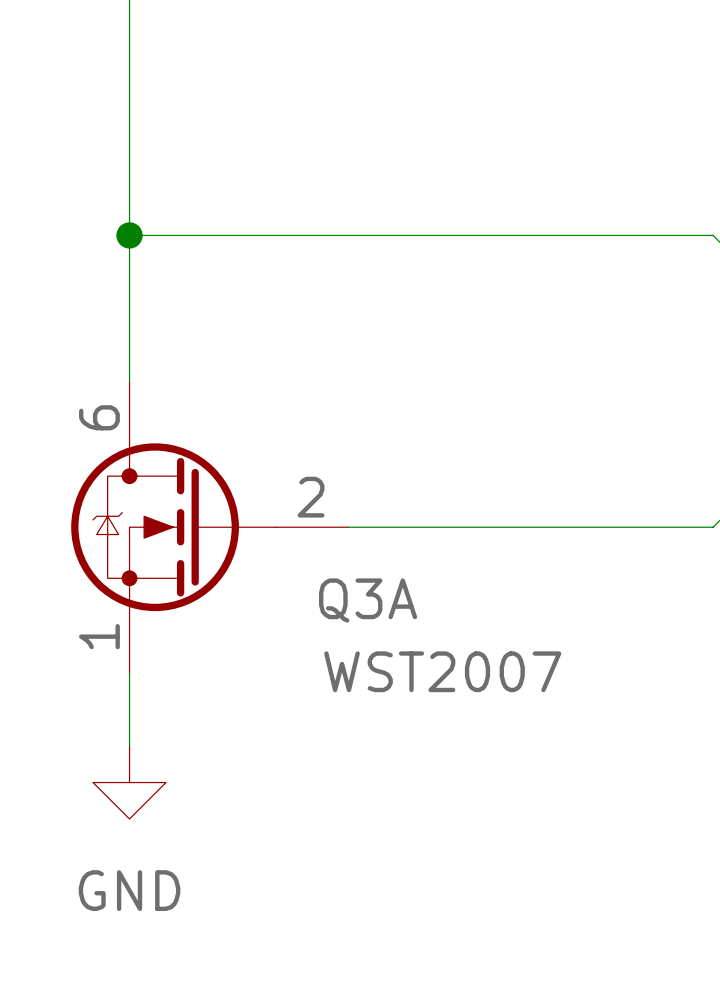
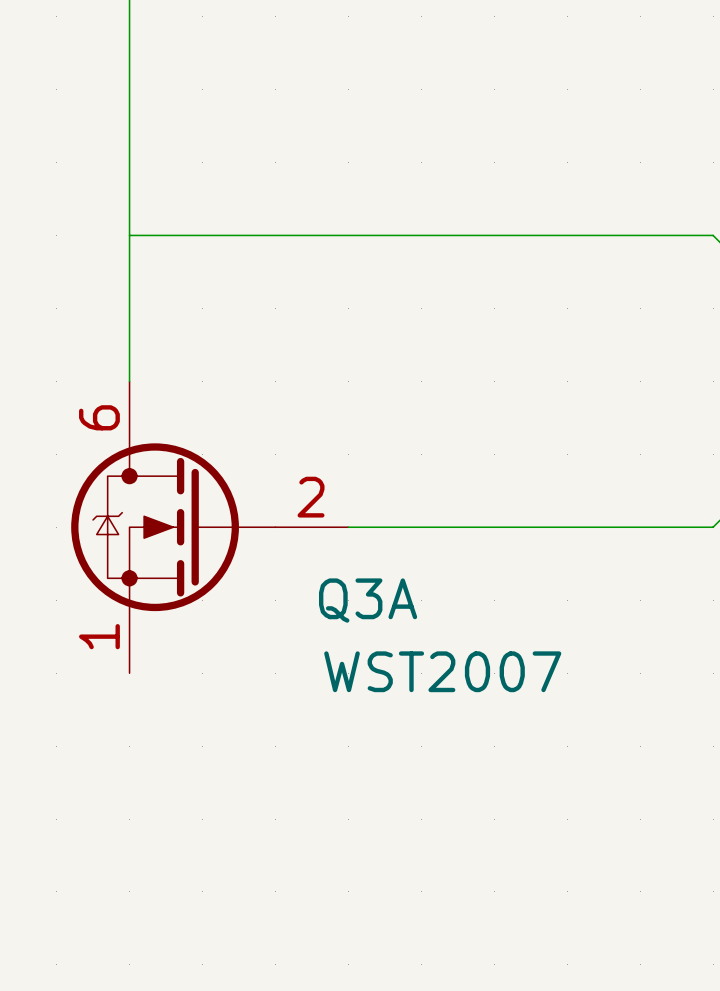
junction: (129, 235) -> none
wire: (129, 673) (129, 746) -> none
power symbol: GND (129, 782) -> none

